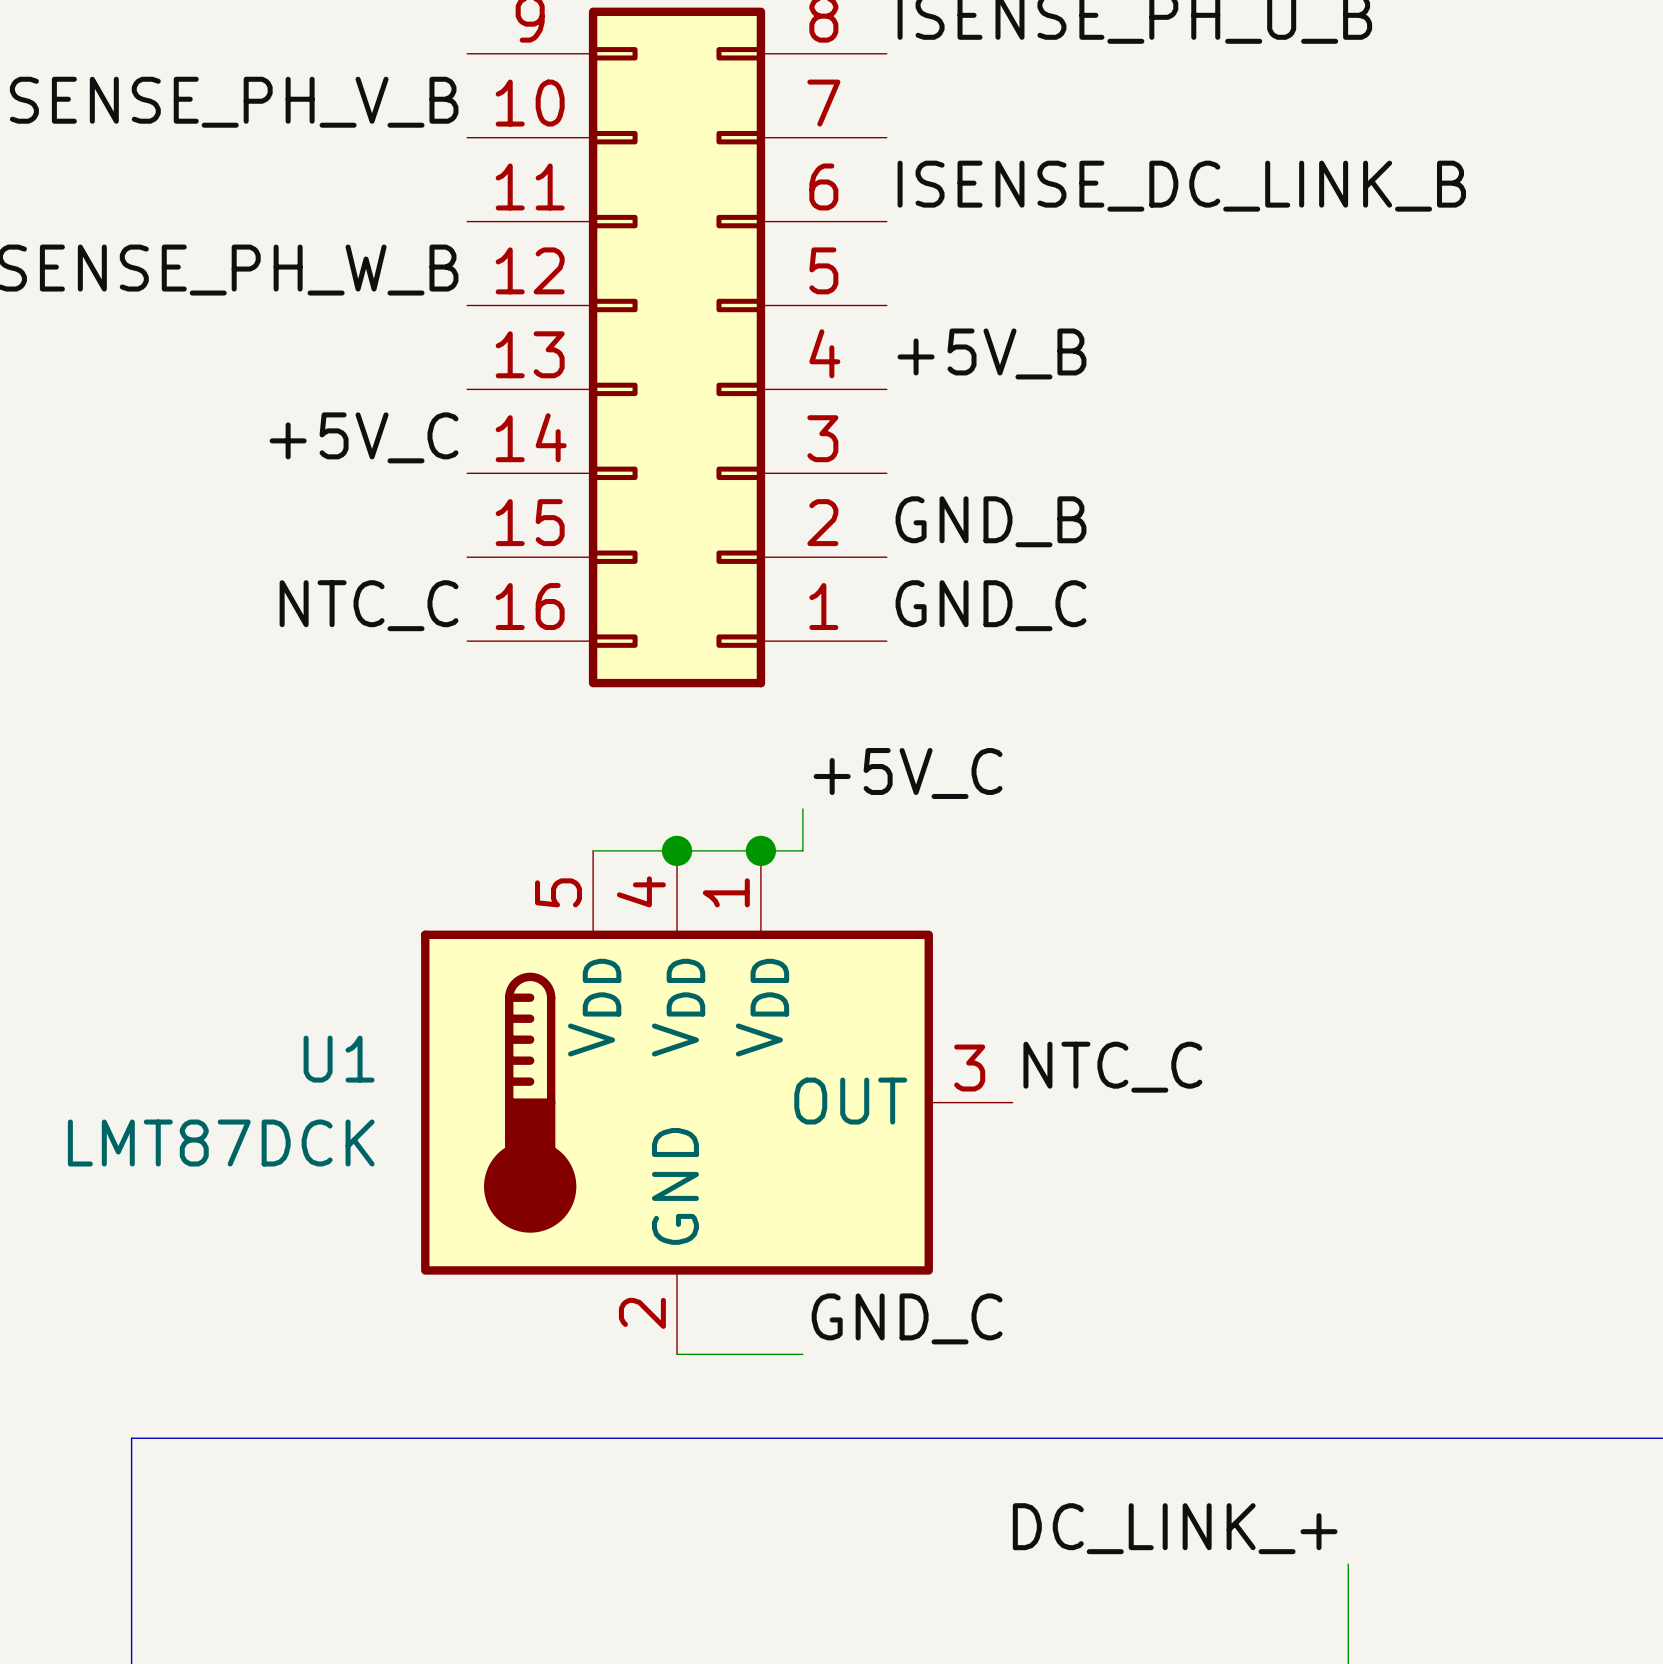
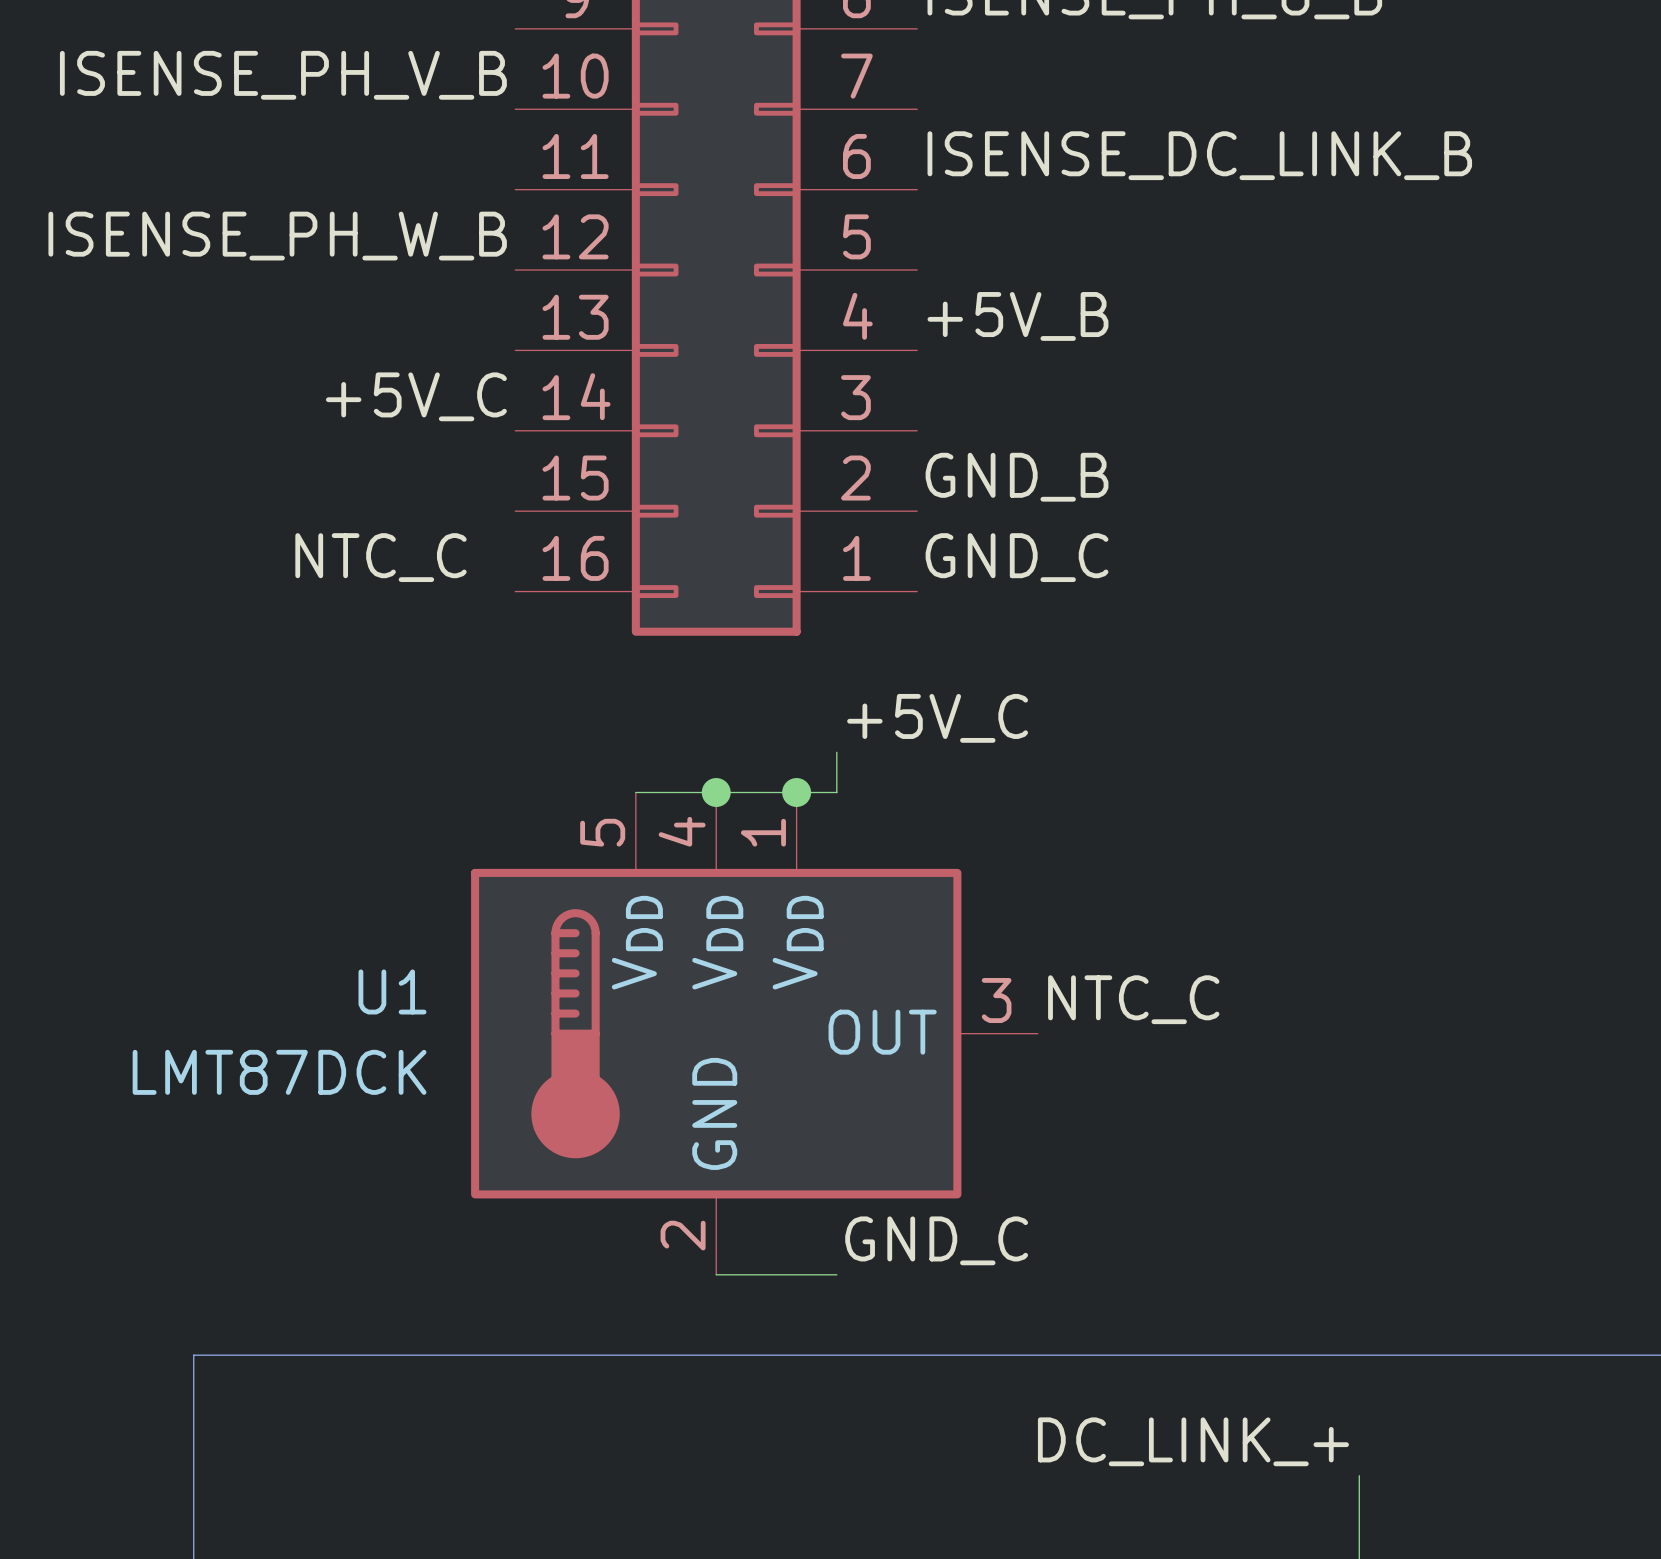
label position: NTC_C (369, 605) -> NTC_C (381, 557)

